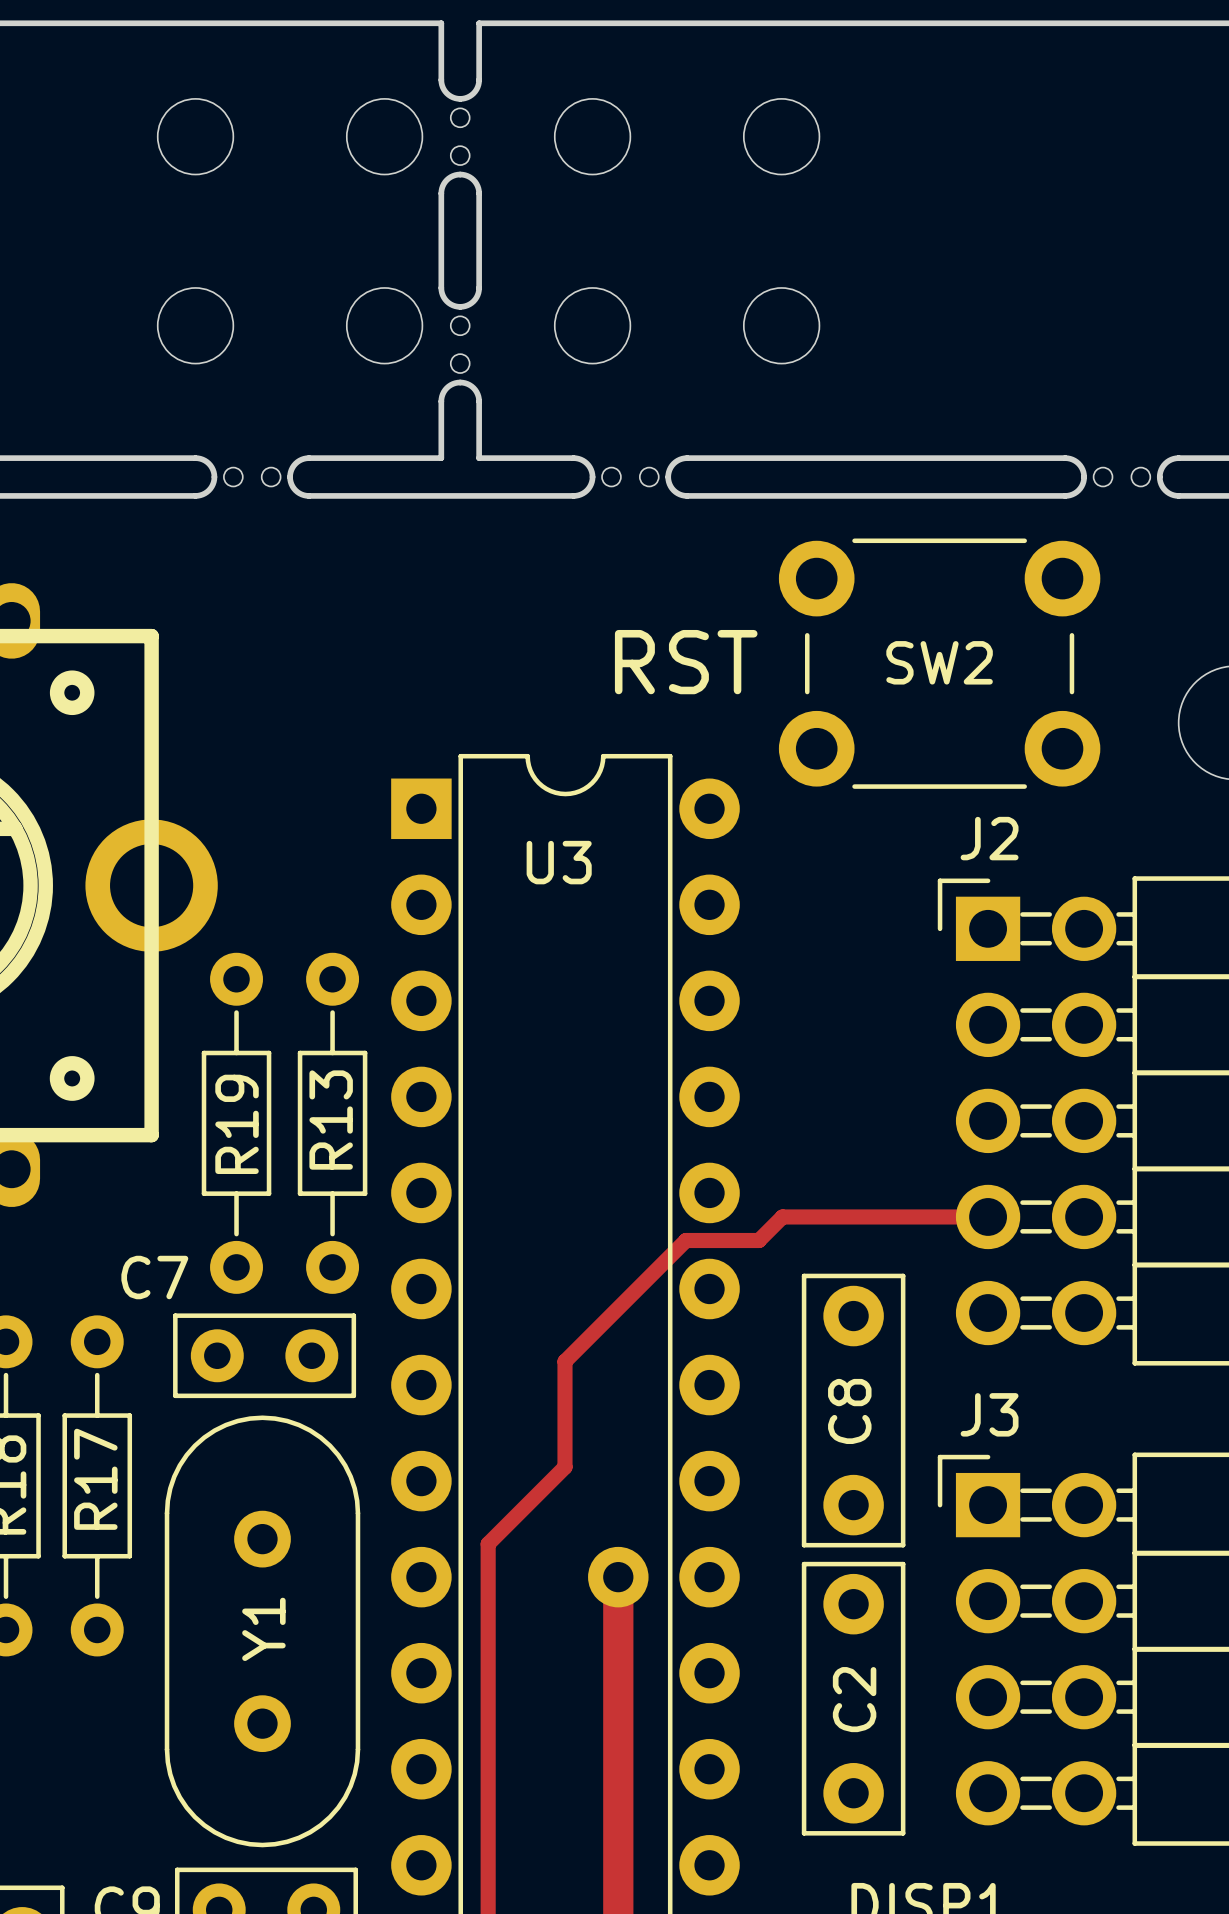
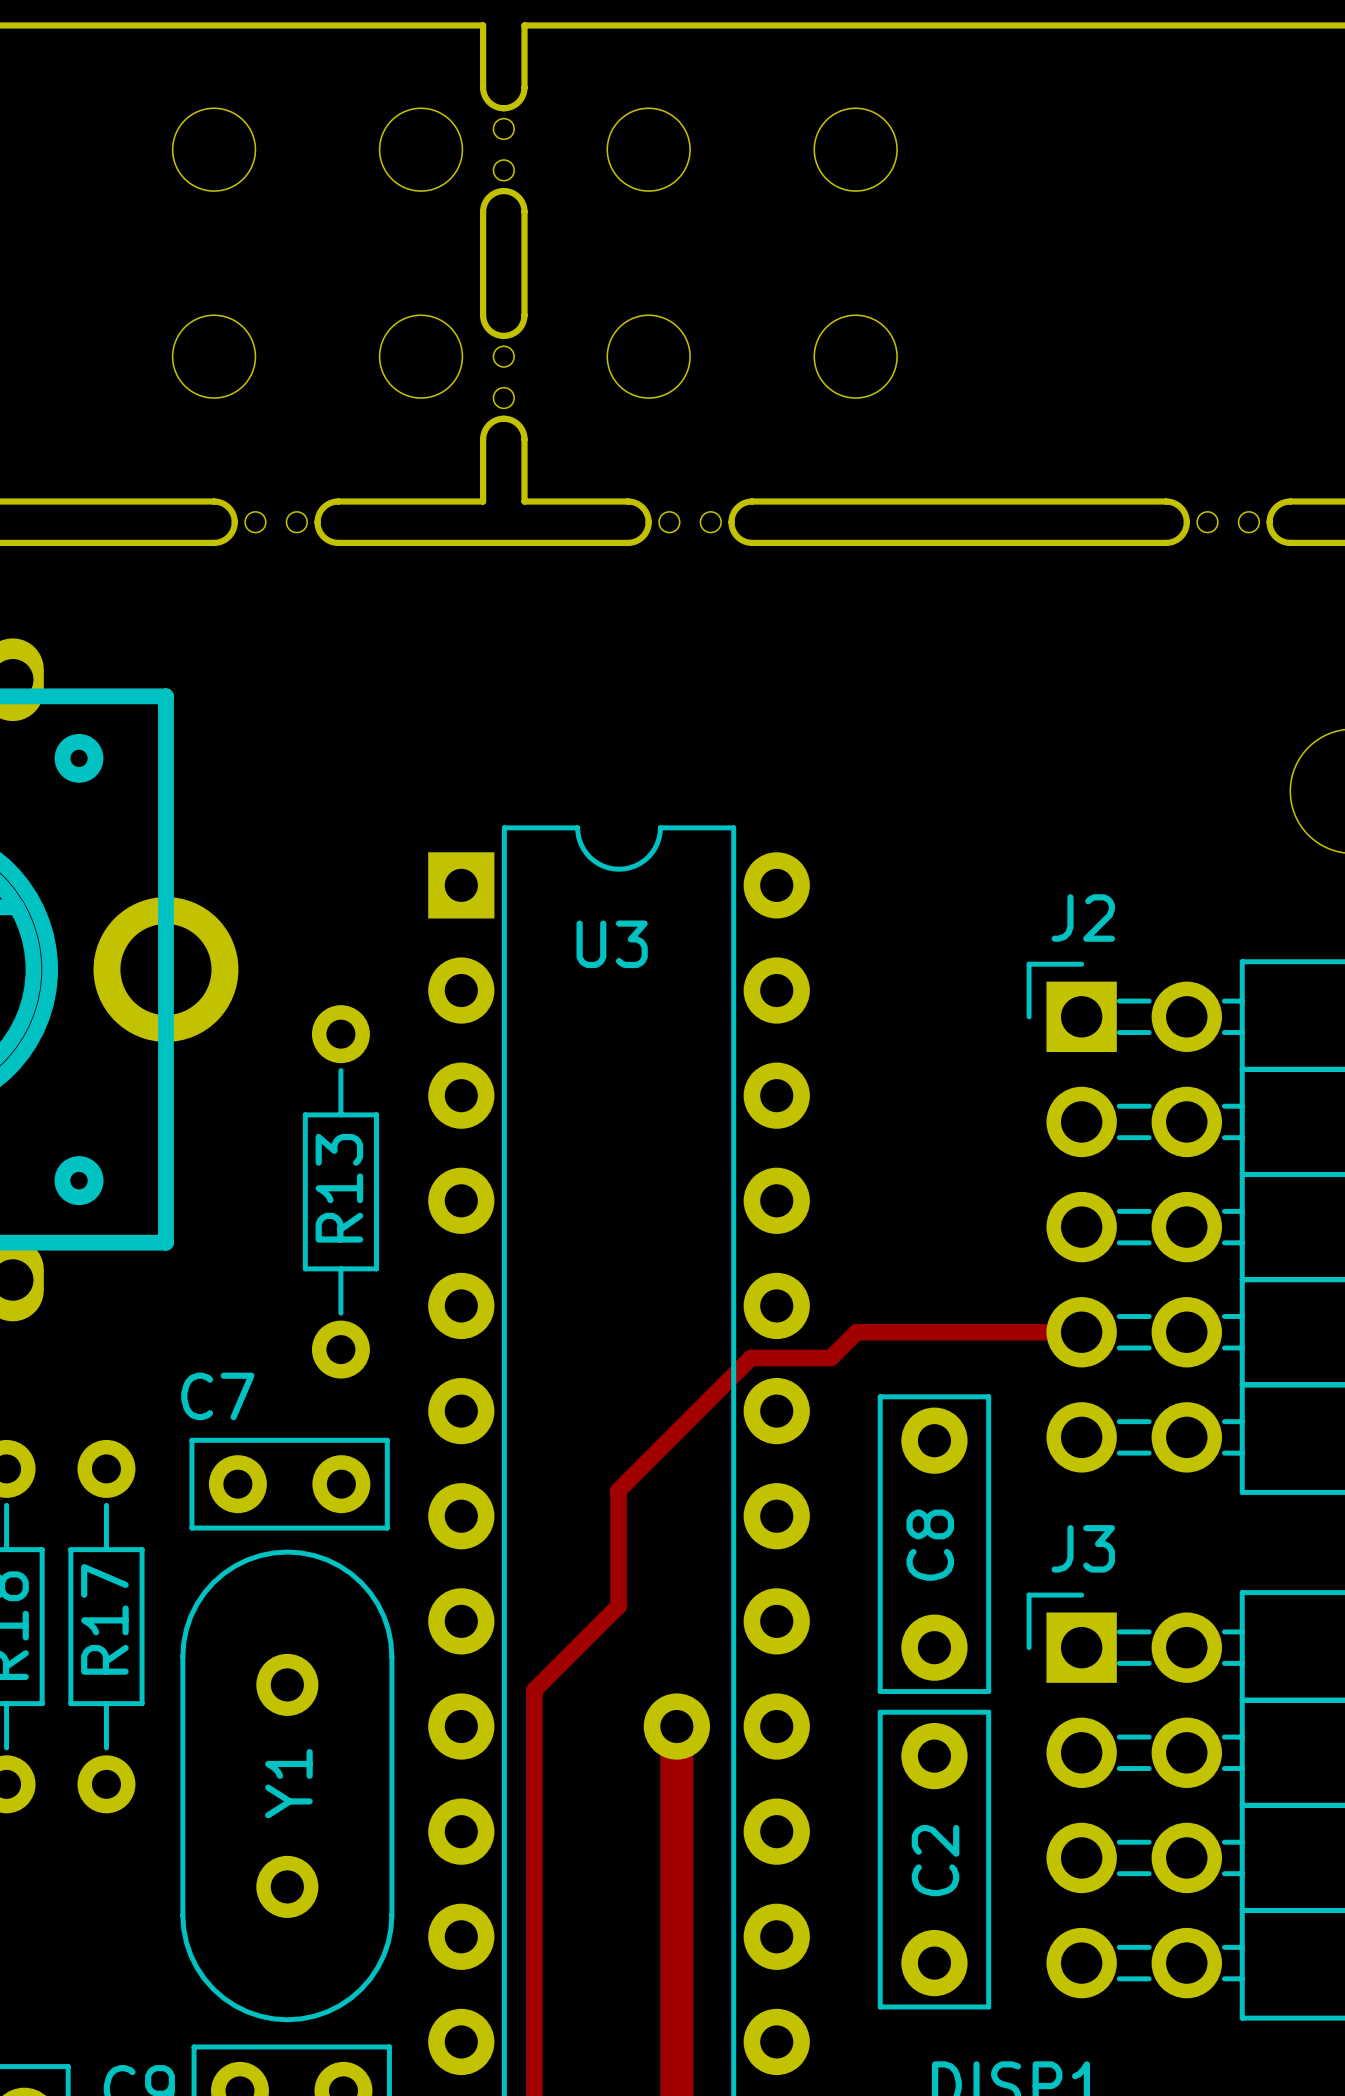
text: RST (686, 662) -> none
SW2: (939, 663) -> none
R19: (236, 1123) -> none
R13 position: (332, 1123) -> (340, 1191)
C7 name position: C7 (154, 1277) -> C7 (217, 1396)

